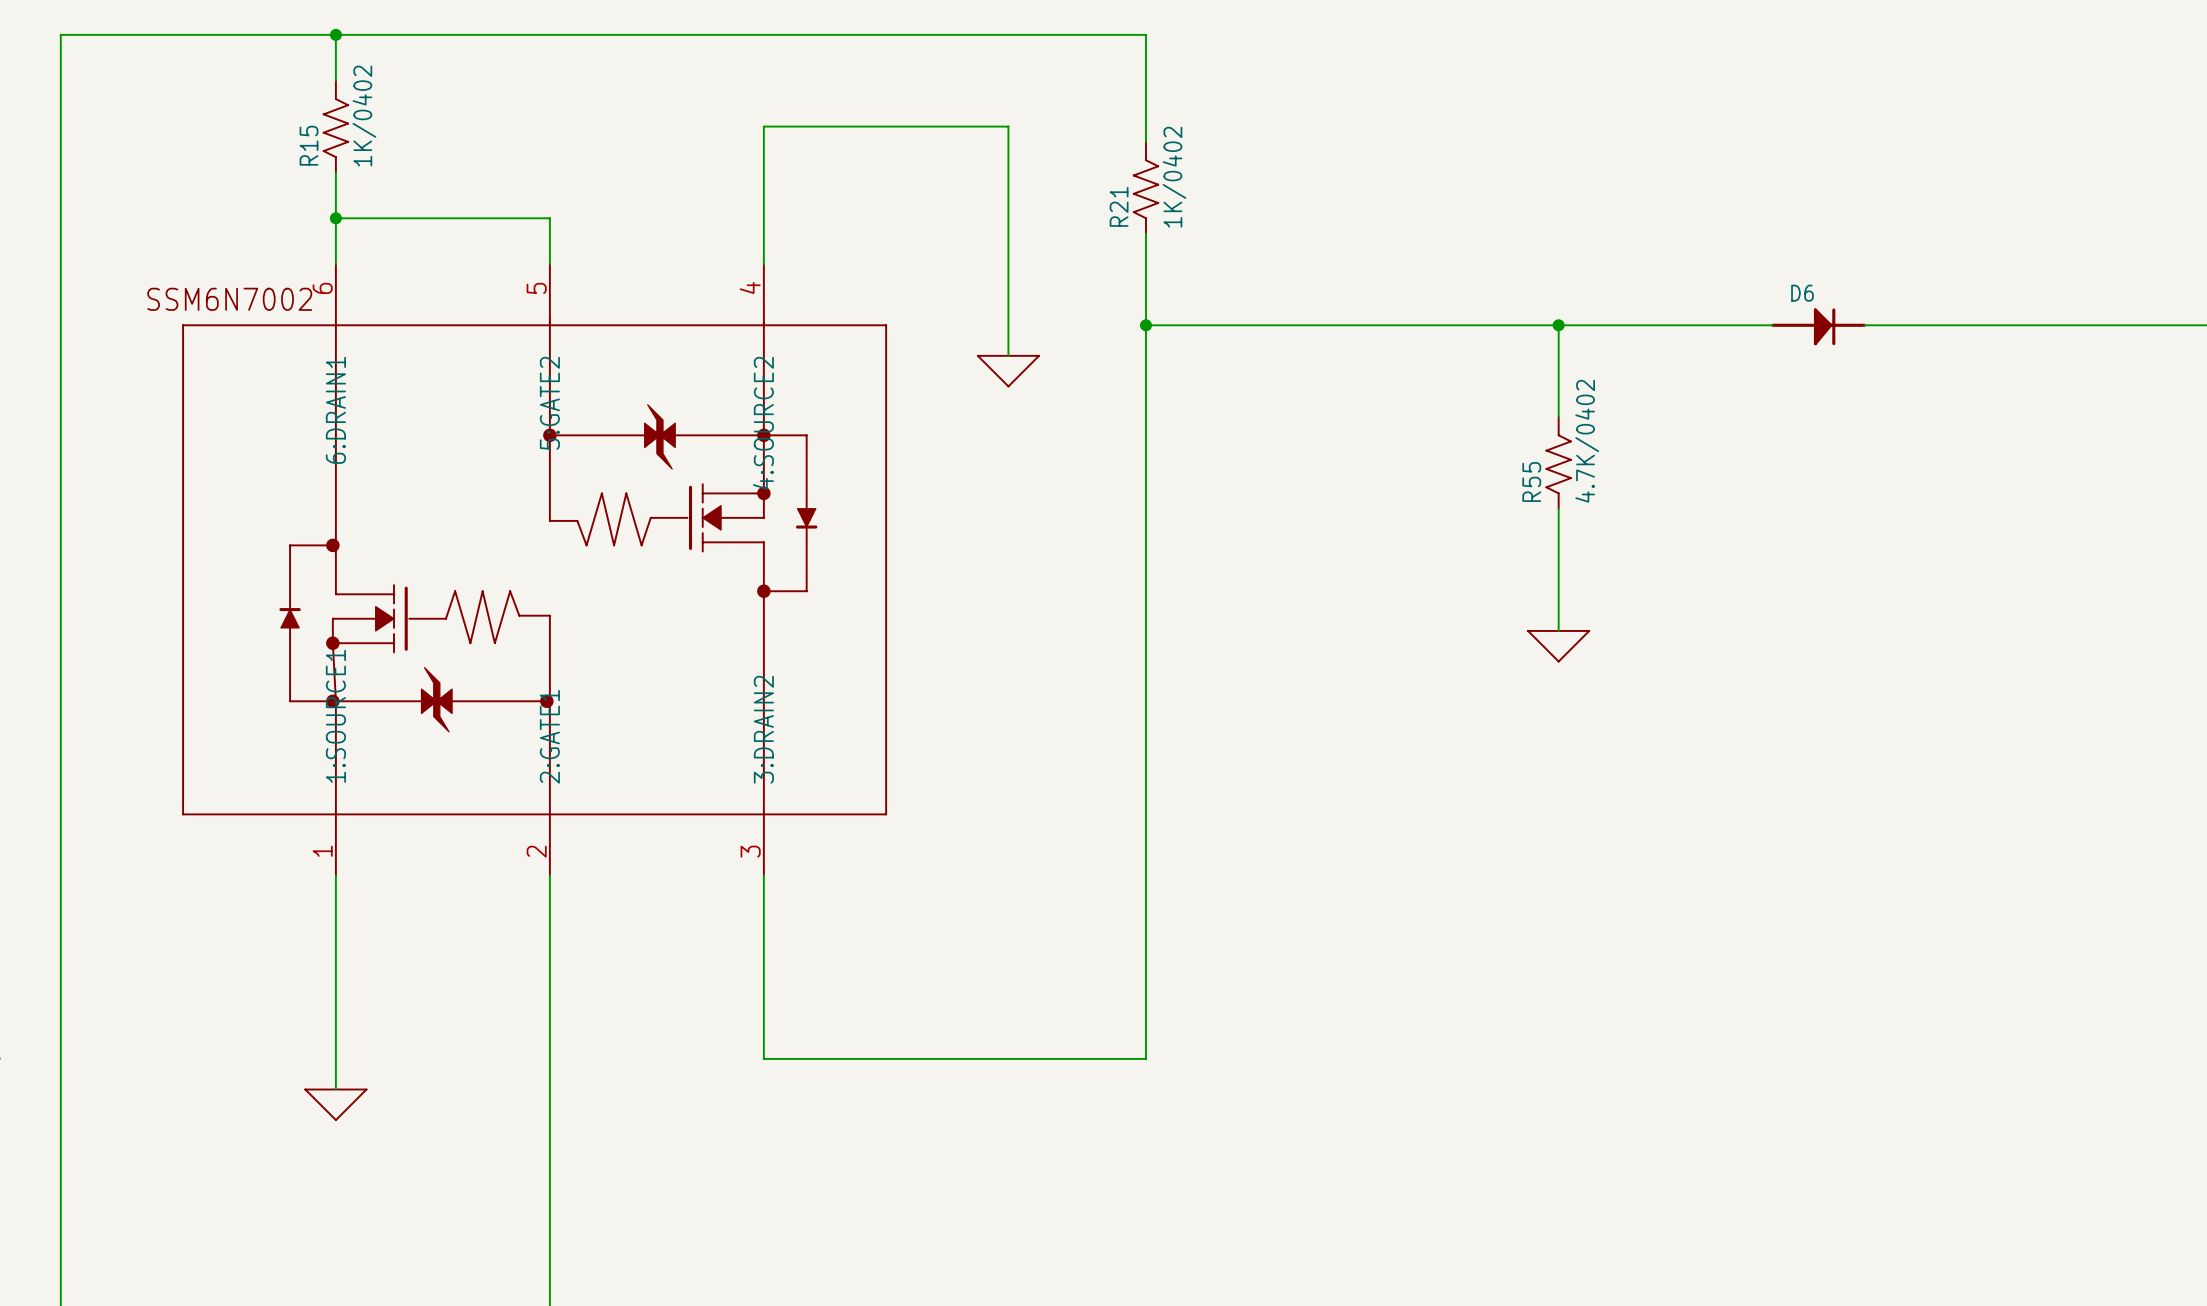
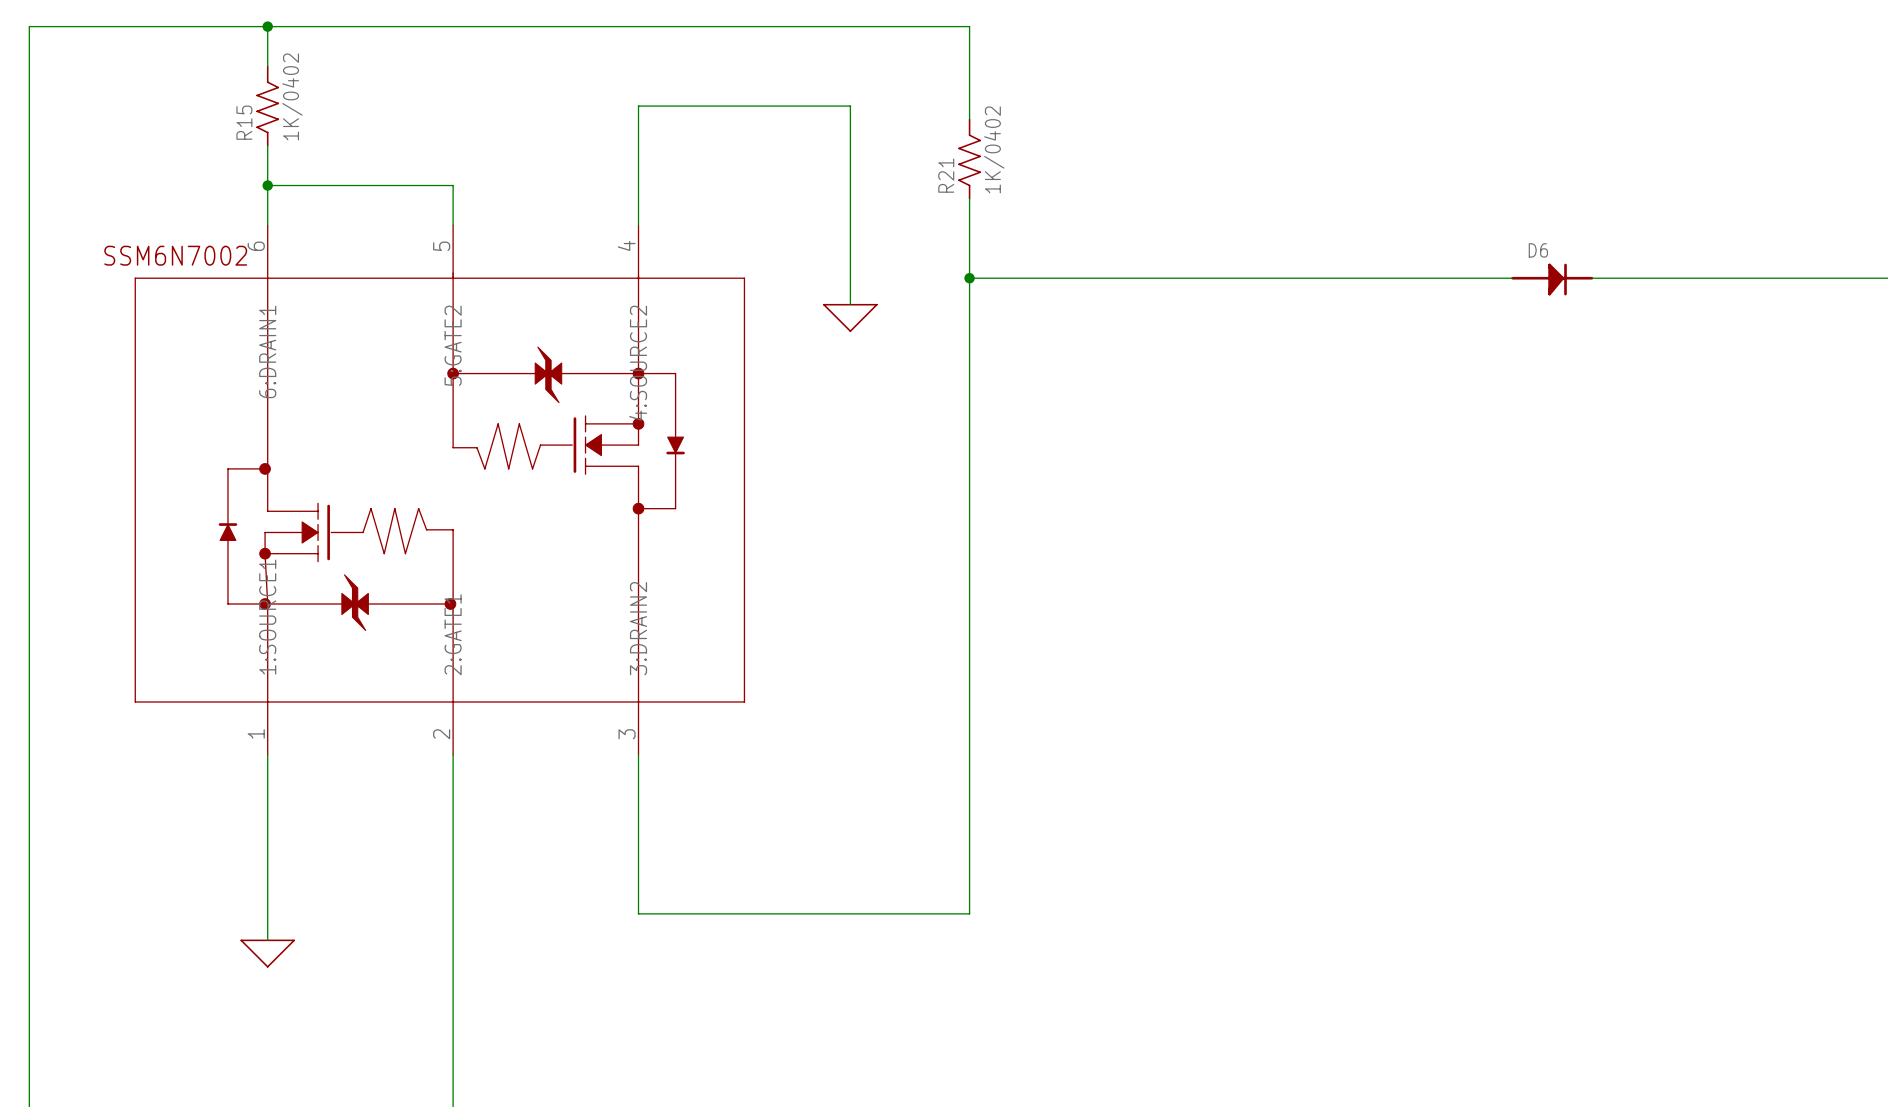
wire: (1558, 325) (1558, 416) -> none
junction: (1558, 325) -> none
R55: 4.7K/0402 (1558, 462) -> none
wire: (1558, 508) (1558, 630) -> none
power symbol: (1558, 646) -> none

